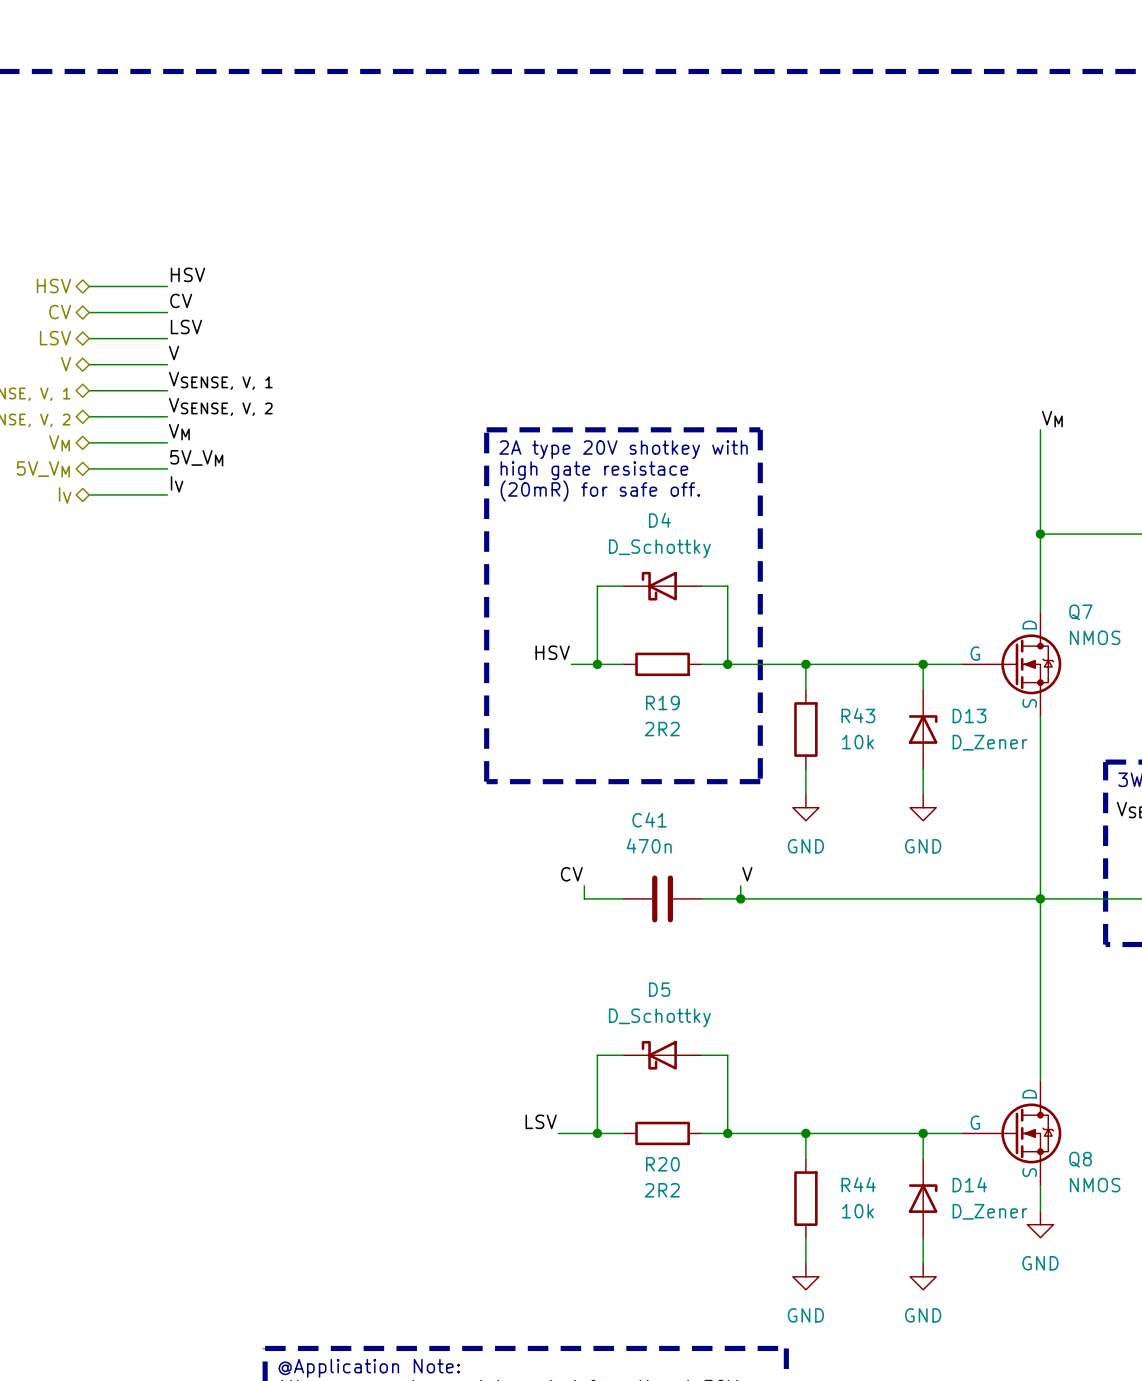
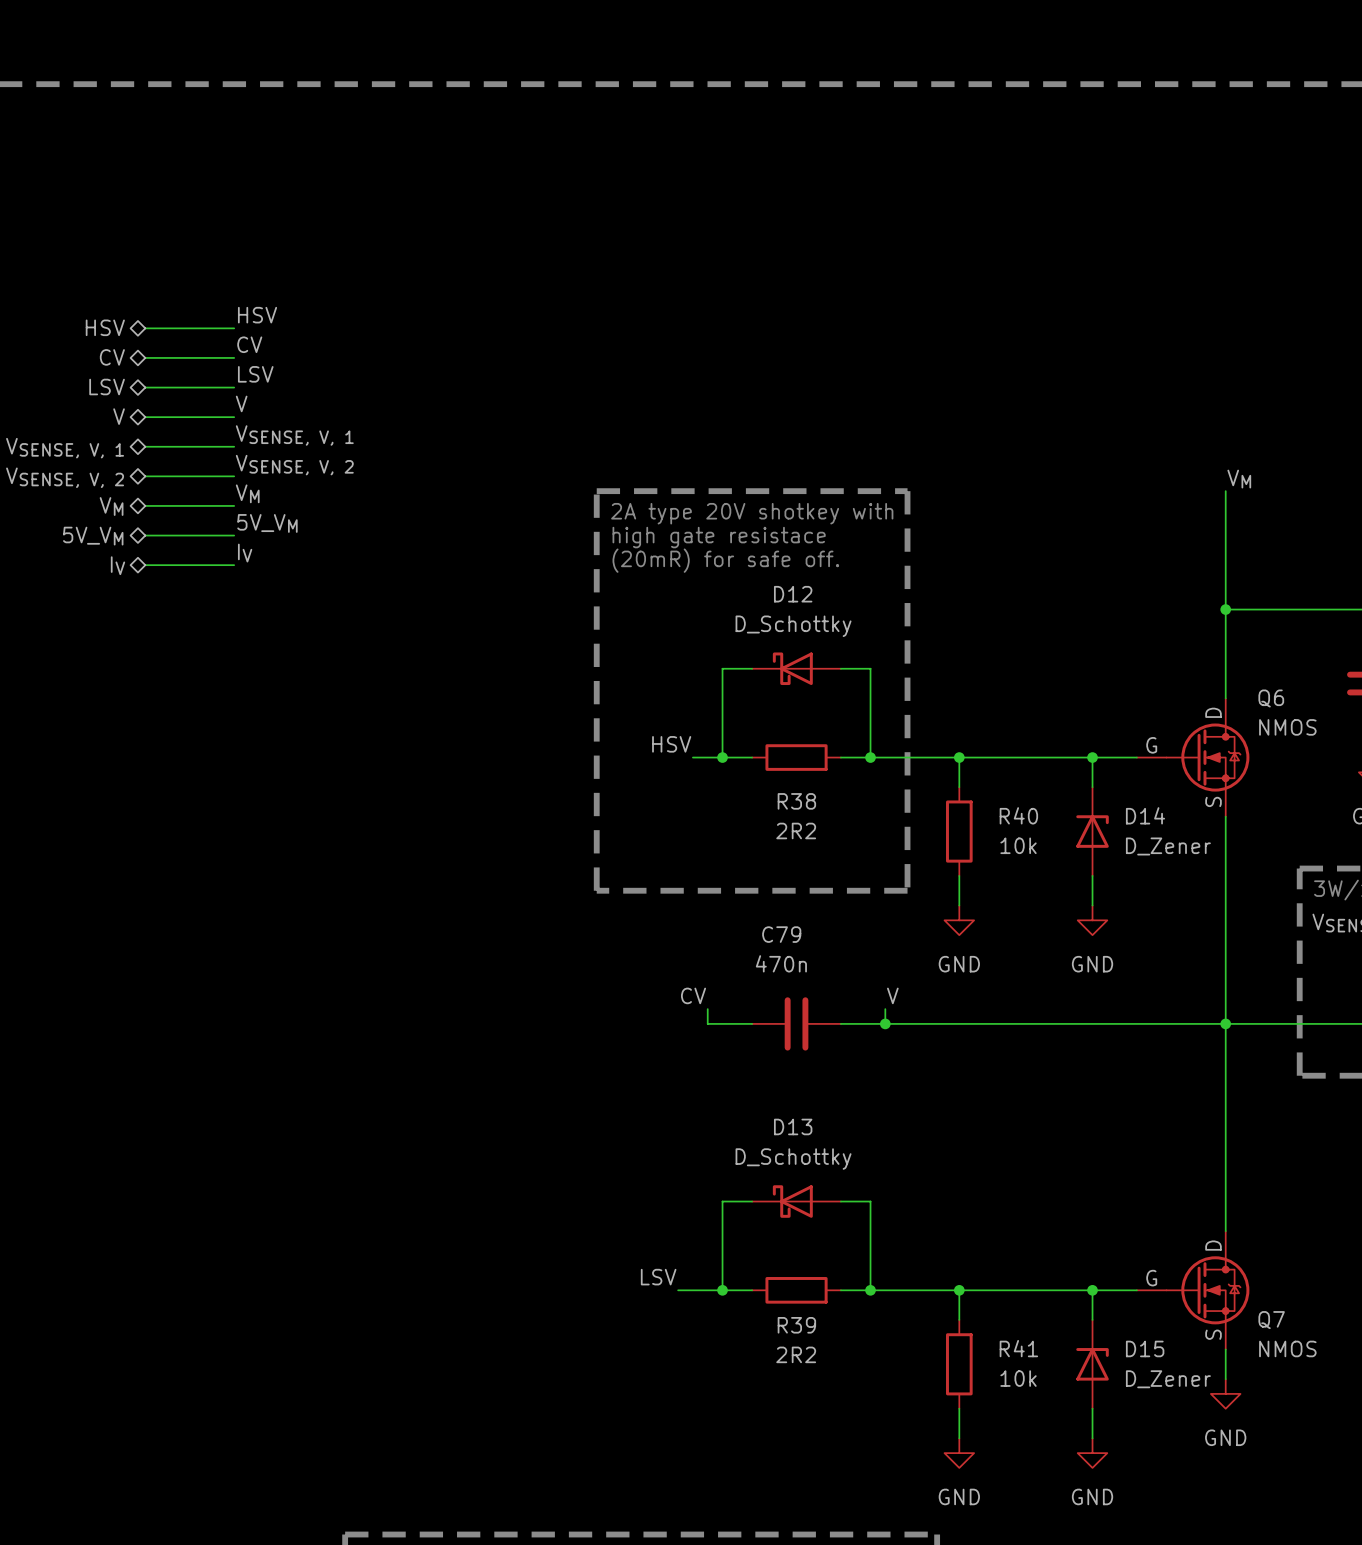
D4 name: D4 (659, 520) -> D12 (793, 594)
Q7 name: Q7 (1080, 612) -> Q6 (1271, 698)
R19 name: R19 (662, 702) -> R38 (796, 801)
R43 name: R43 (858, 715) -> R40 (1018, 815)
D13 name: D13 (969, 716) -> D14 (1145, 815)
C41 name: C41 (649, 819) -> C79 (781, 934)
D5 name: D5 (659, 989) -> D13 (793, 1126)
Q8 name: Q8 (1080, 1159) -> Q7 (1271, 1320)
R20 name: R20 (662, 1164) -> R39 (796, 1325)
R44 name: R44 (858, 1184) -> R41 (1018, 1348)
D14 name: D14 (969, 1184) -> D15 (1145, 1348)

